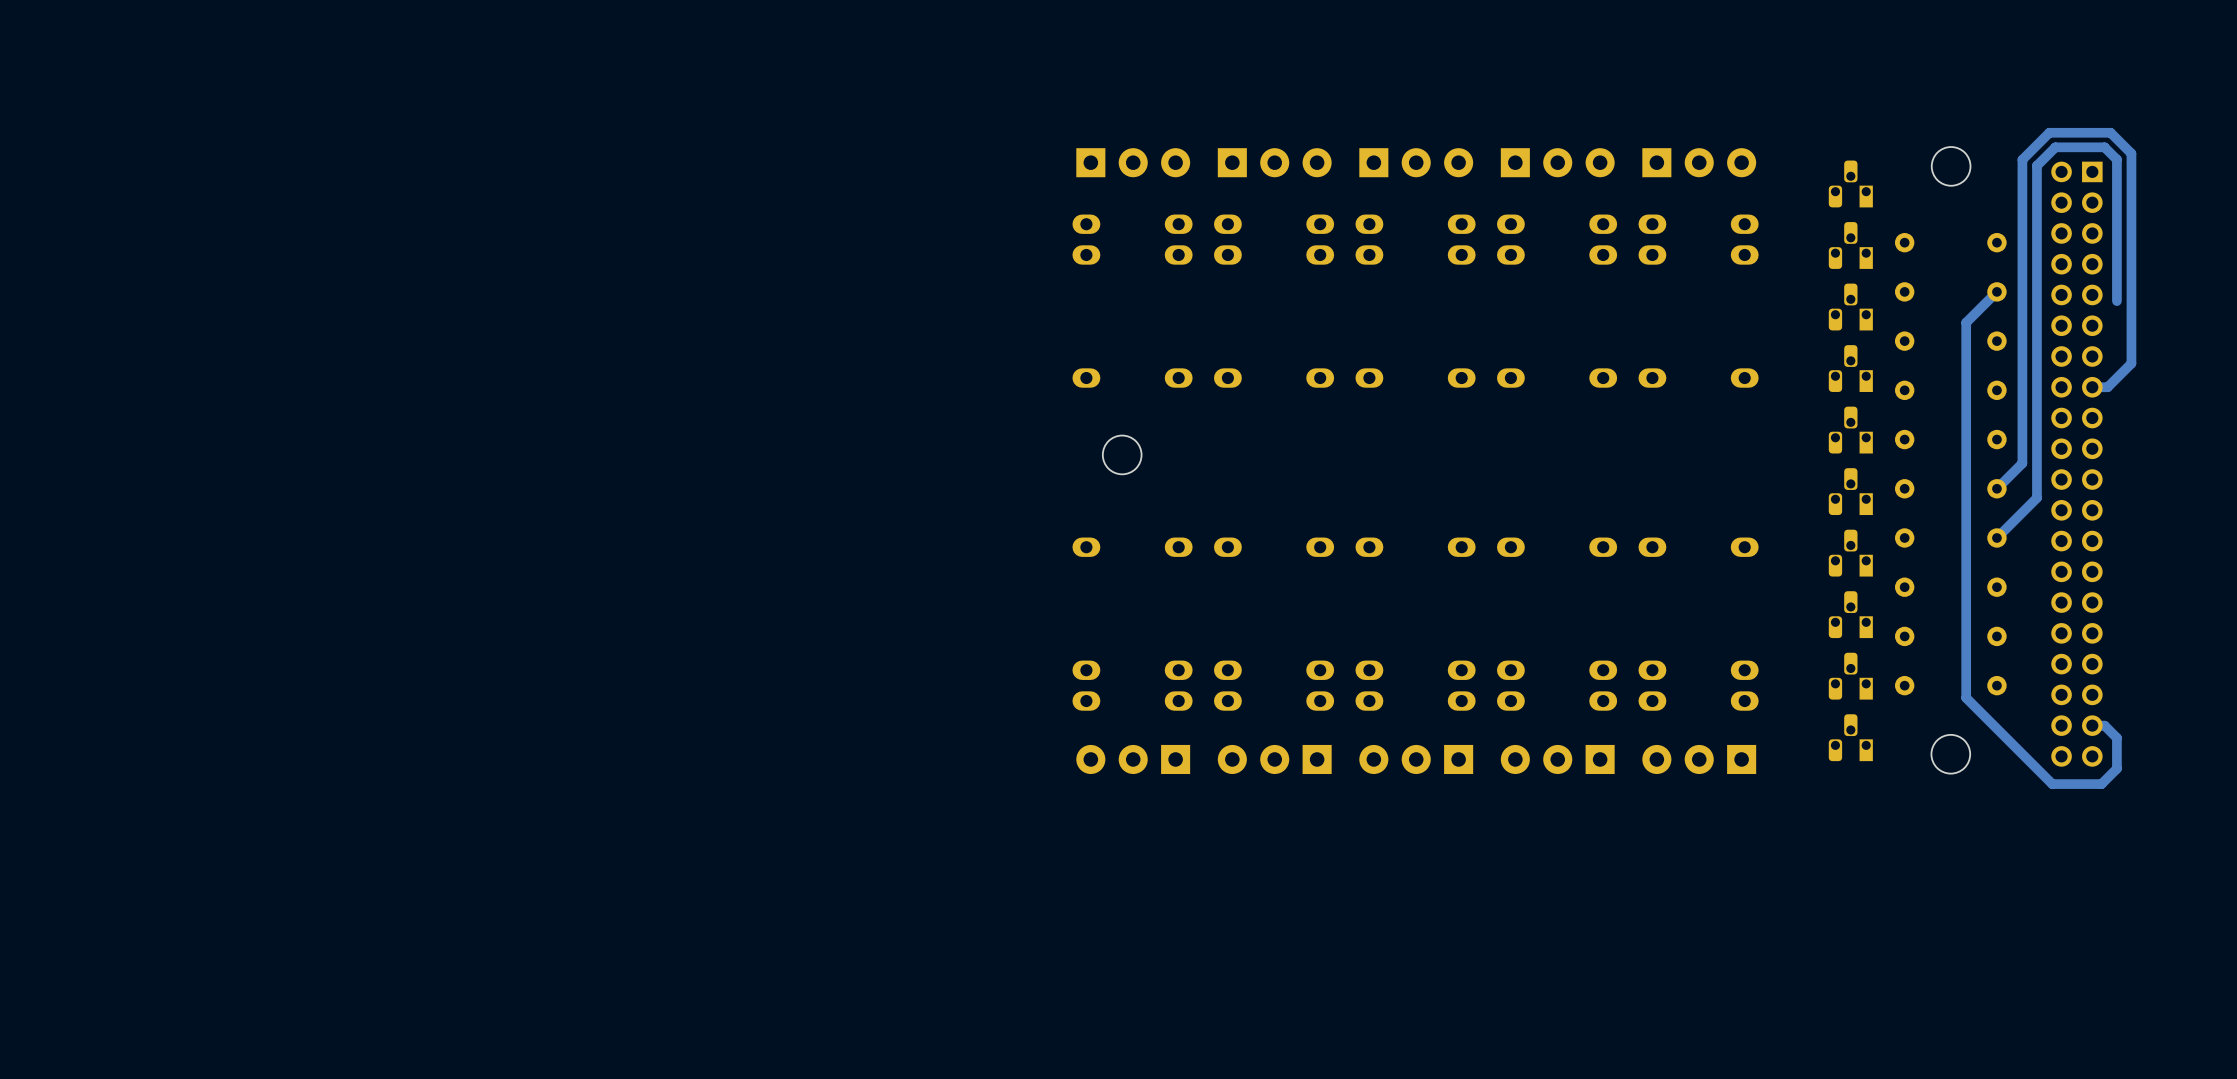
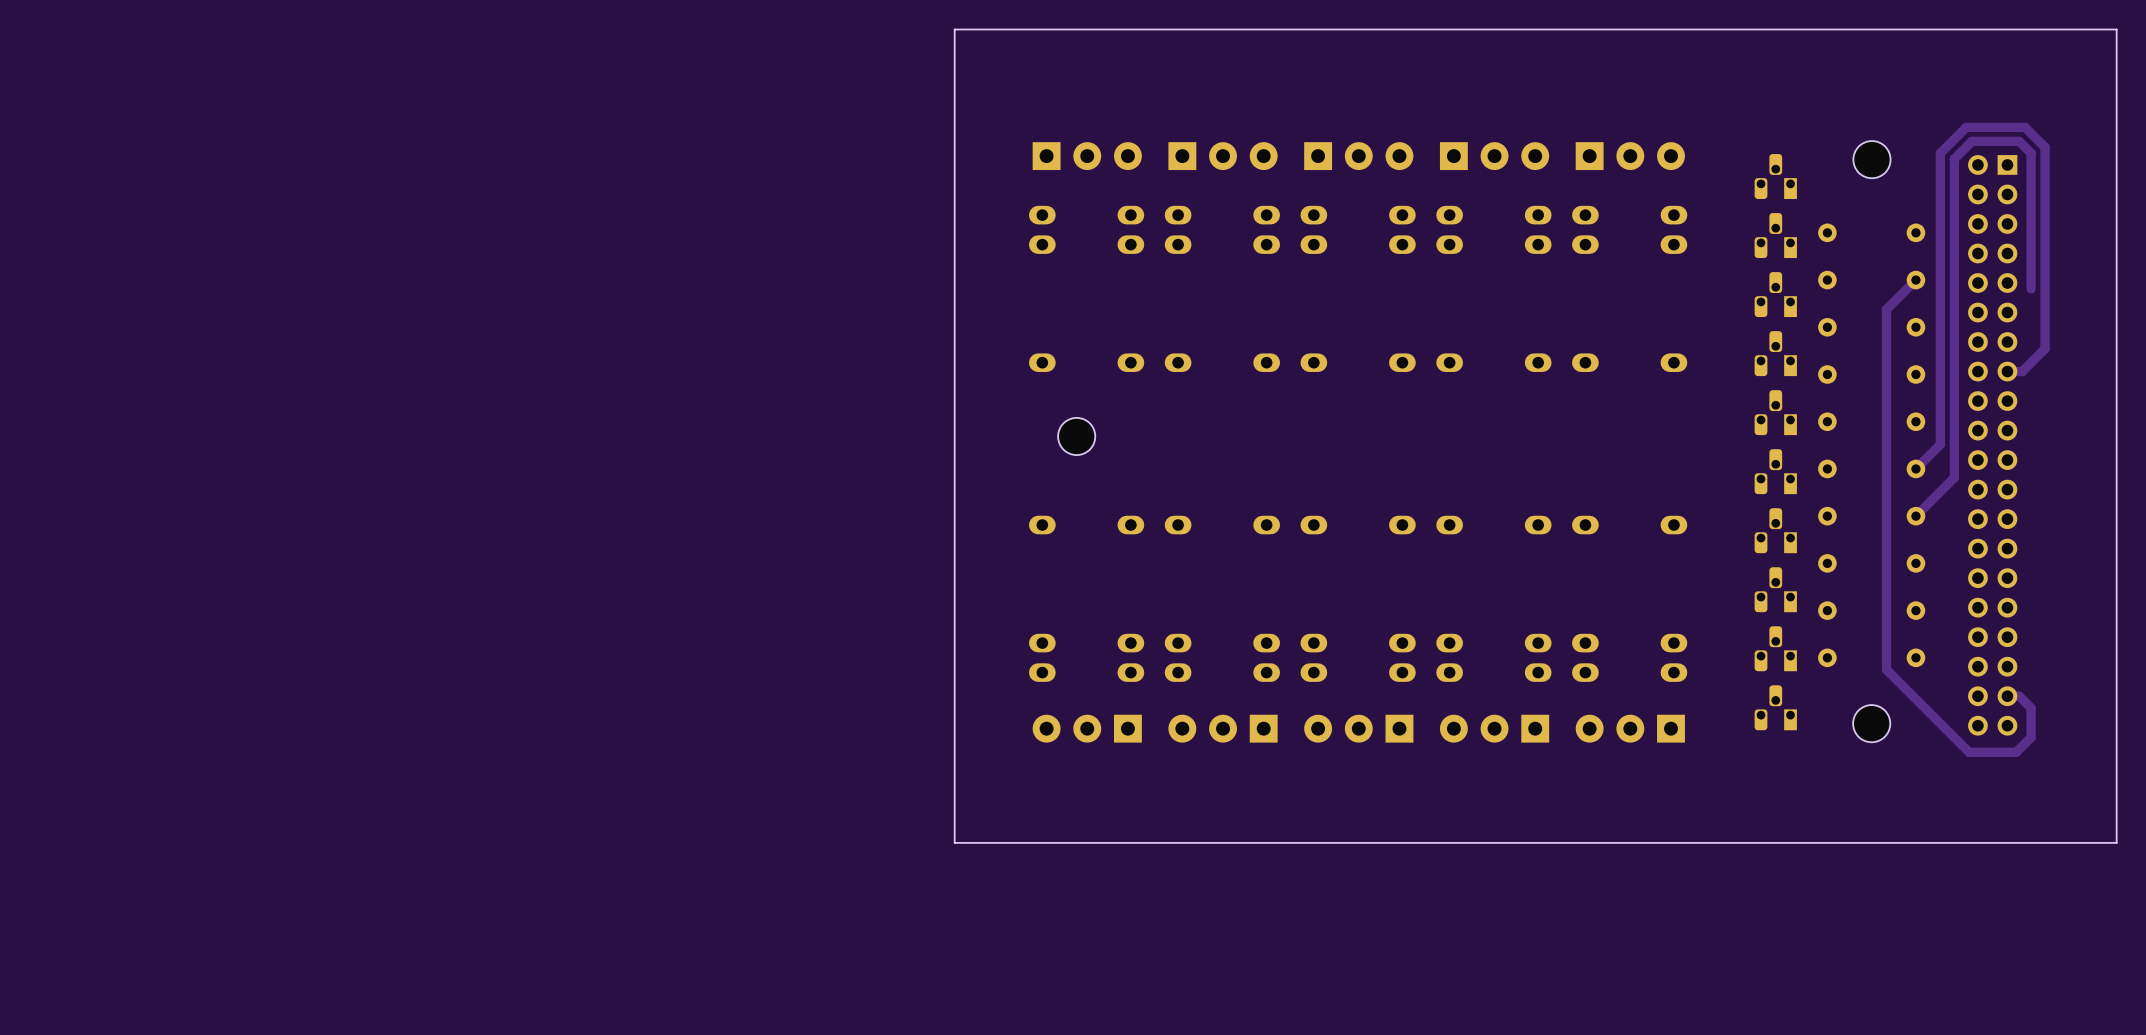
board edge: none -> (2116, 29) (954, 29) (954, 842) (2116, 842) (2116, 29)

